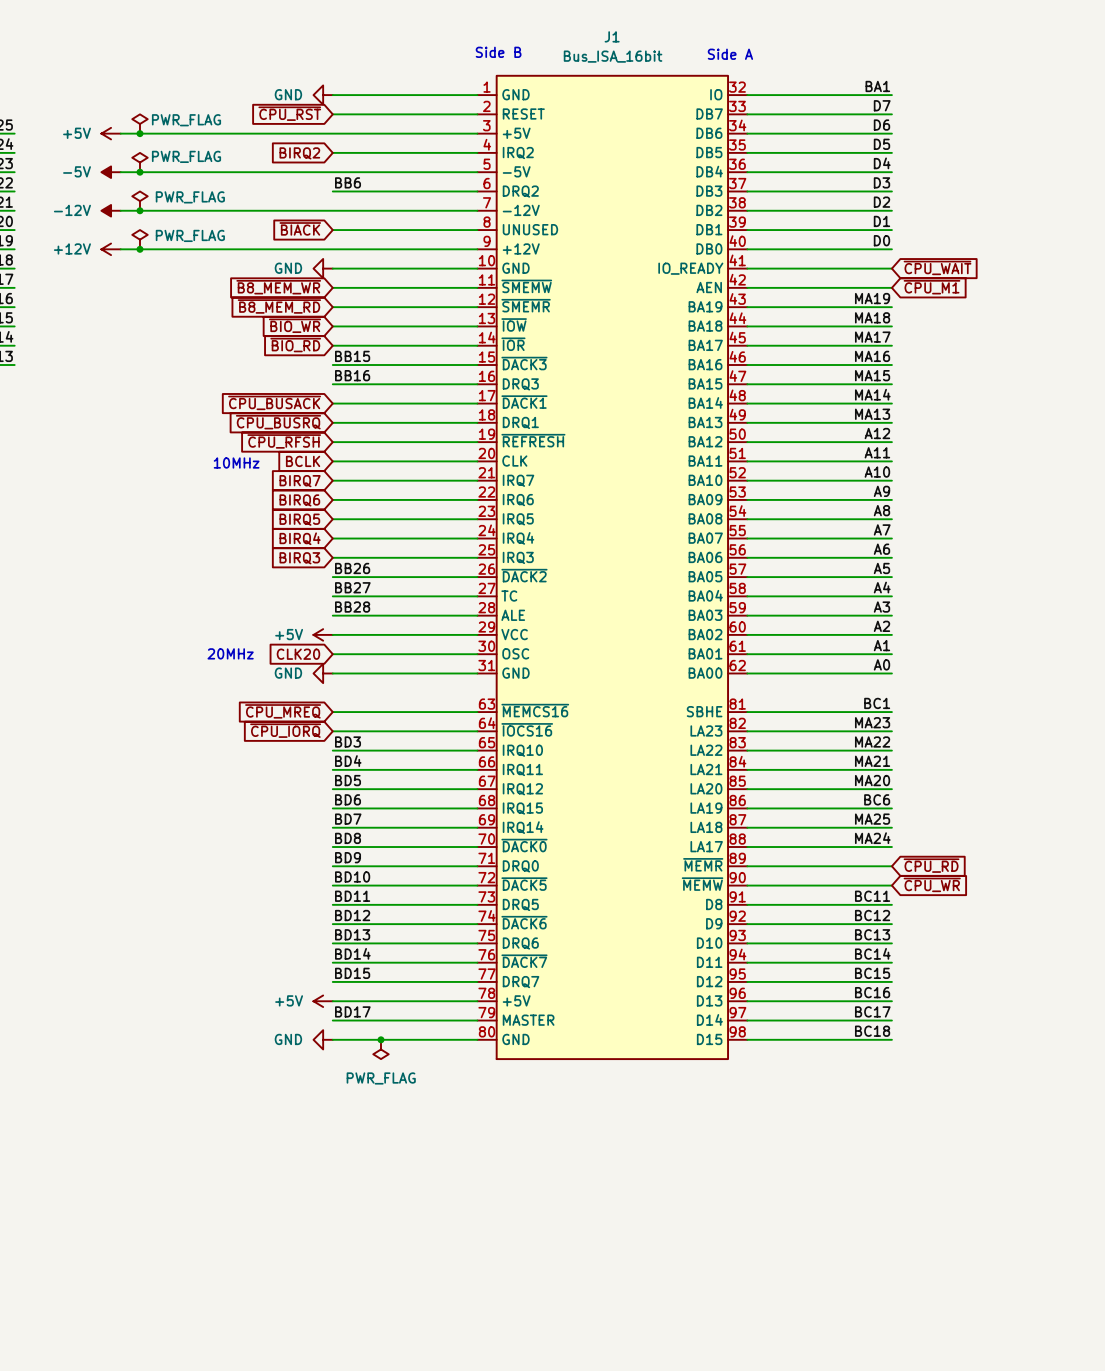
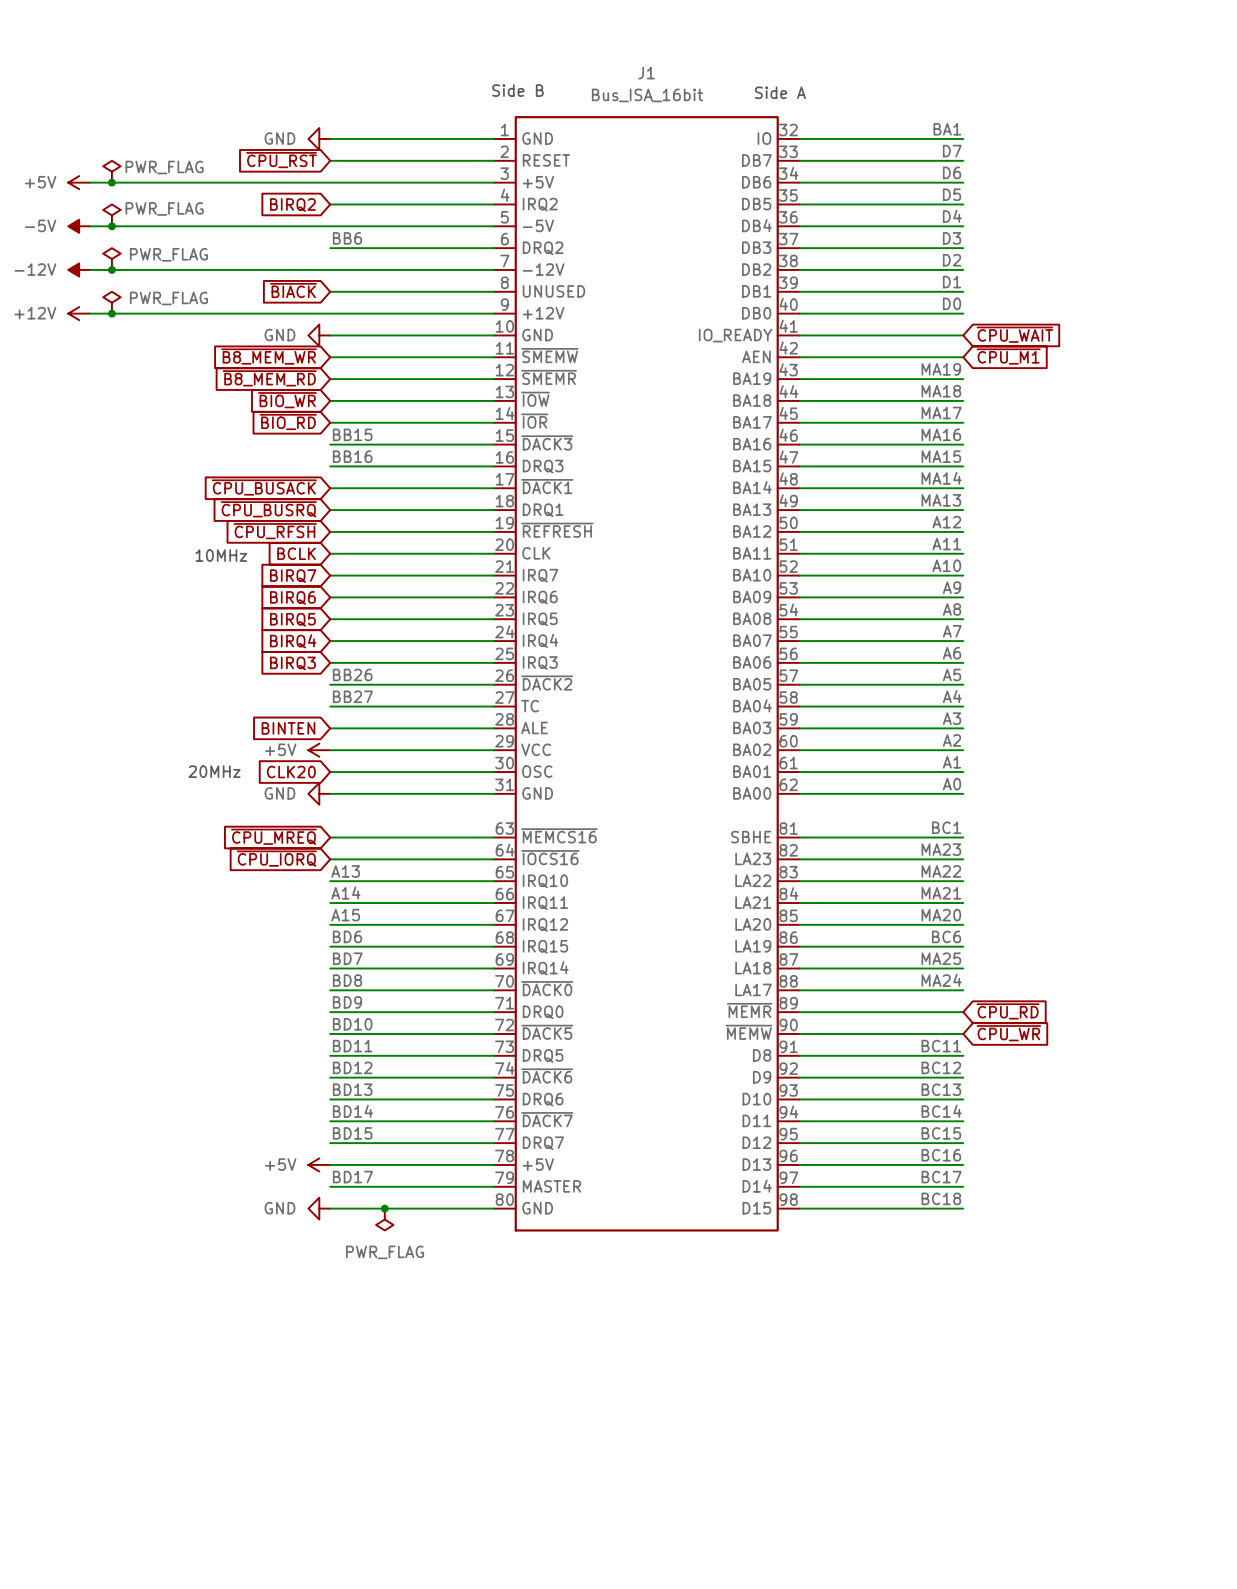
label: BB28 (352, 607) -> none
global label: none -> BINTEN (288, 728)
label: BD3 (348, 742) -> A13 (345, 871)
label: BD4 (348, 761) -> A14 (345, 893)
label: BD5 (348, 780) -> A15 (345, 915)

